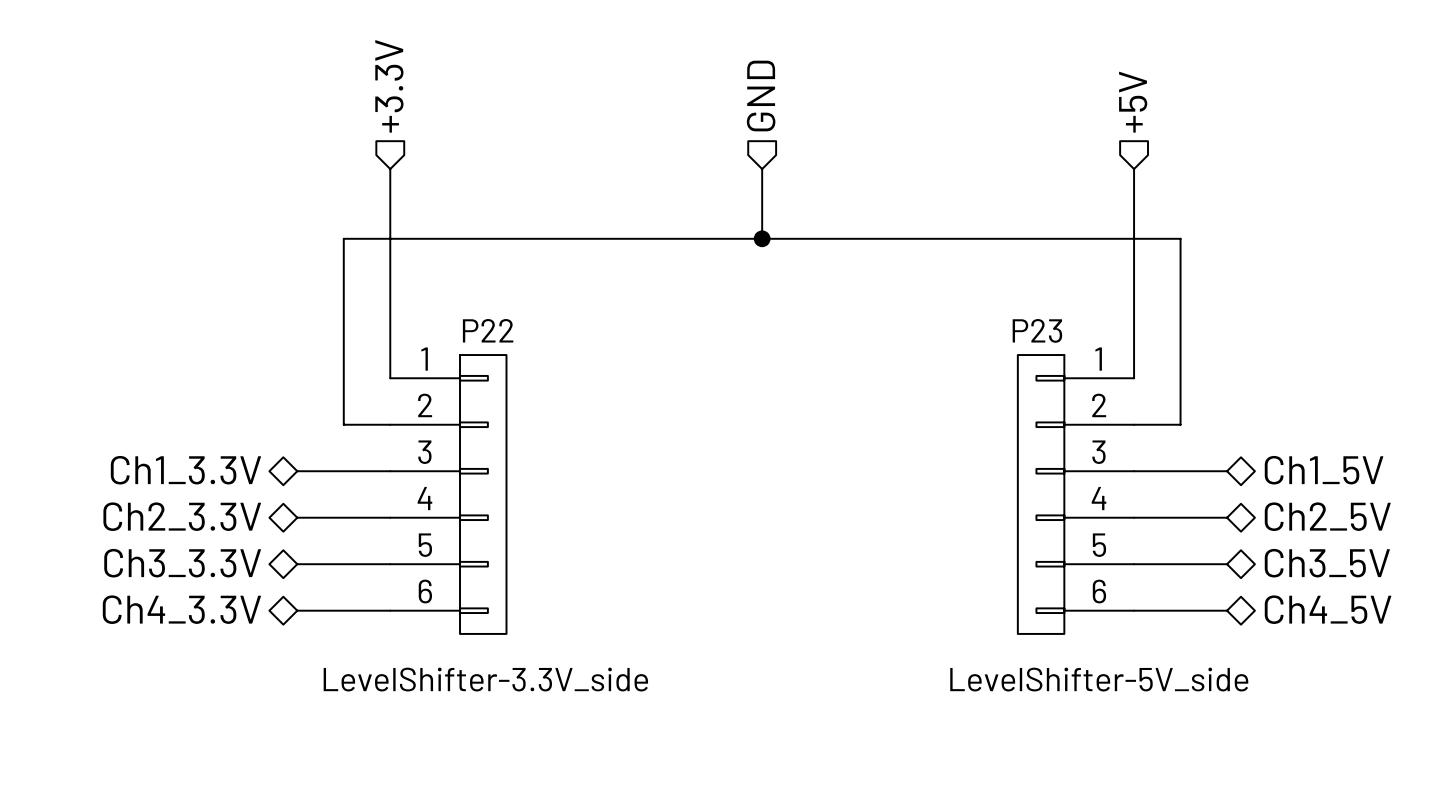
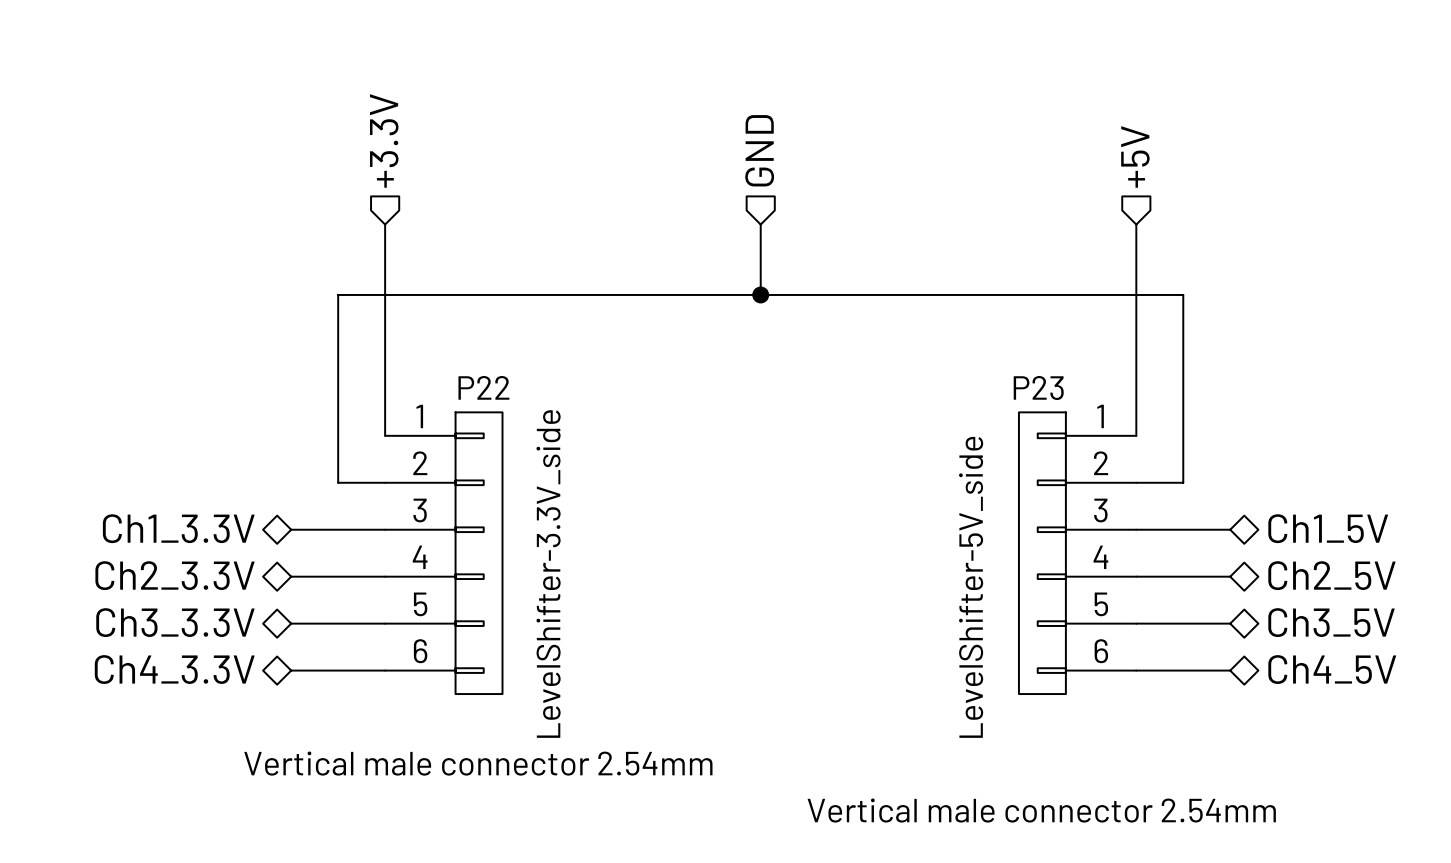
P22 value rotation: 0° (485, 679) -> 90° counterclockwise (548, 574)
P23 value rotation: 0° (1099, 679) -> 90° counterclockwise (971, 587)
P22 text: none -> Vertical male connector 2.54mm (478, 763)
P23 text: none -> Vertical male connector 2.54mm (1041, 810)

